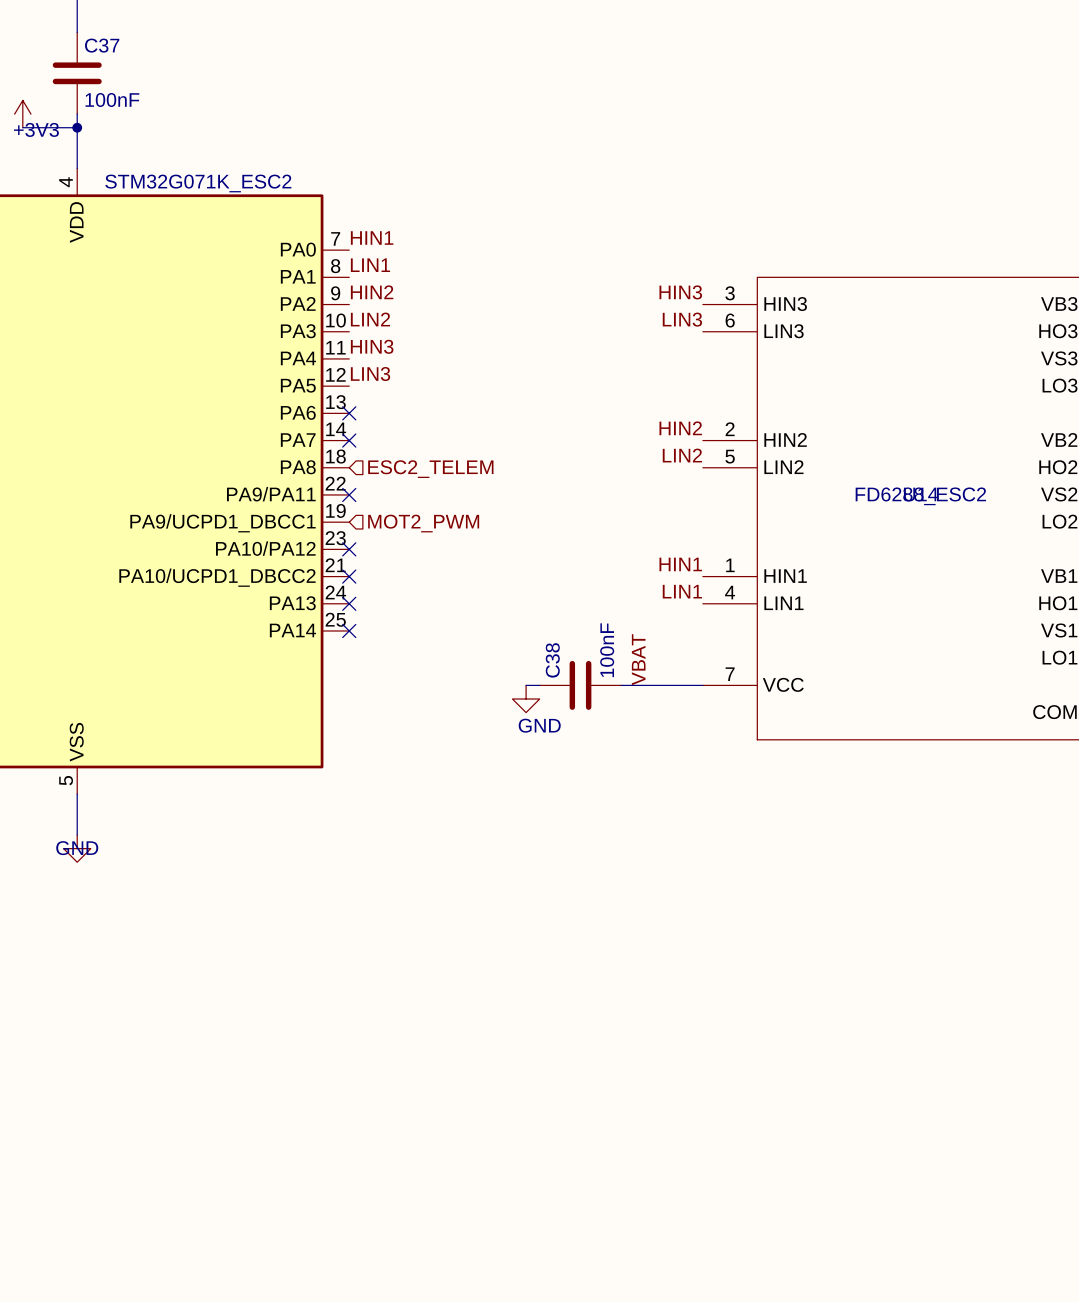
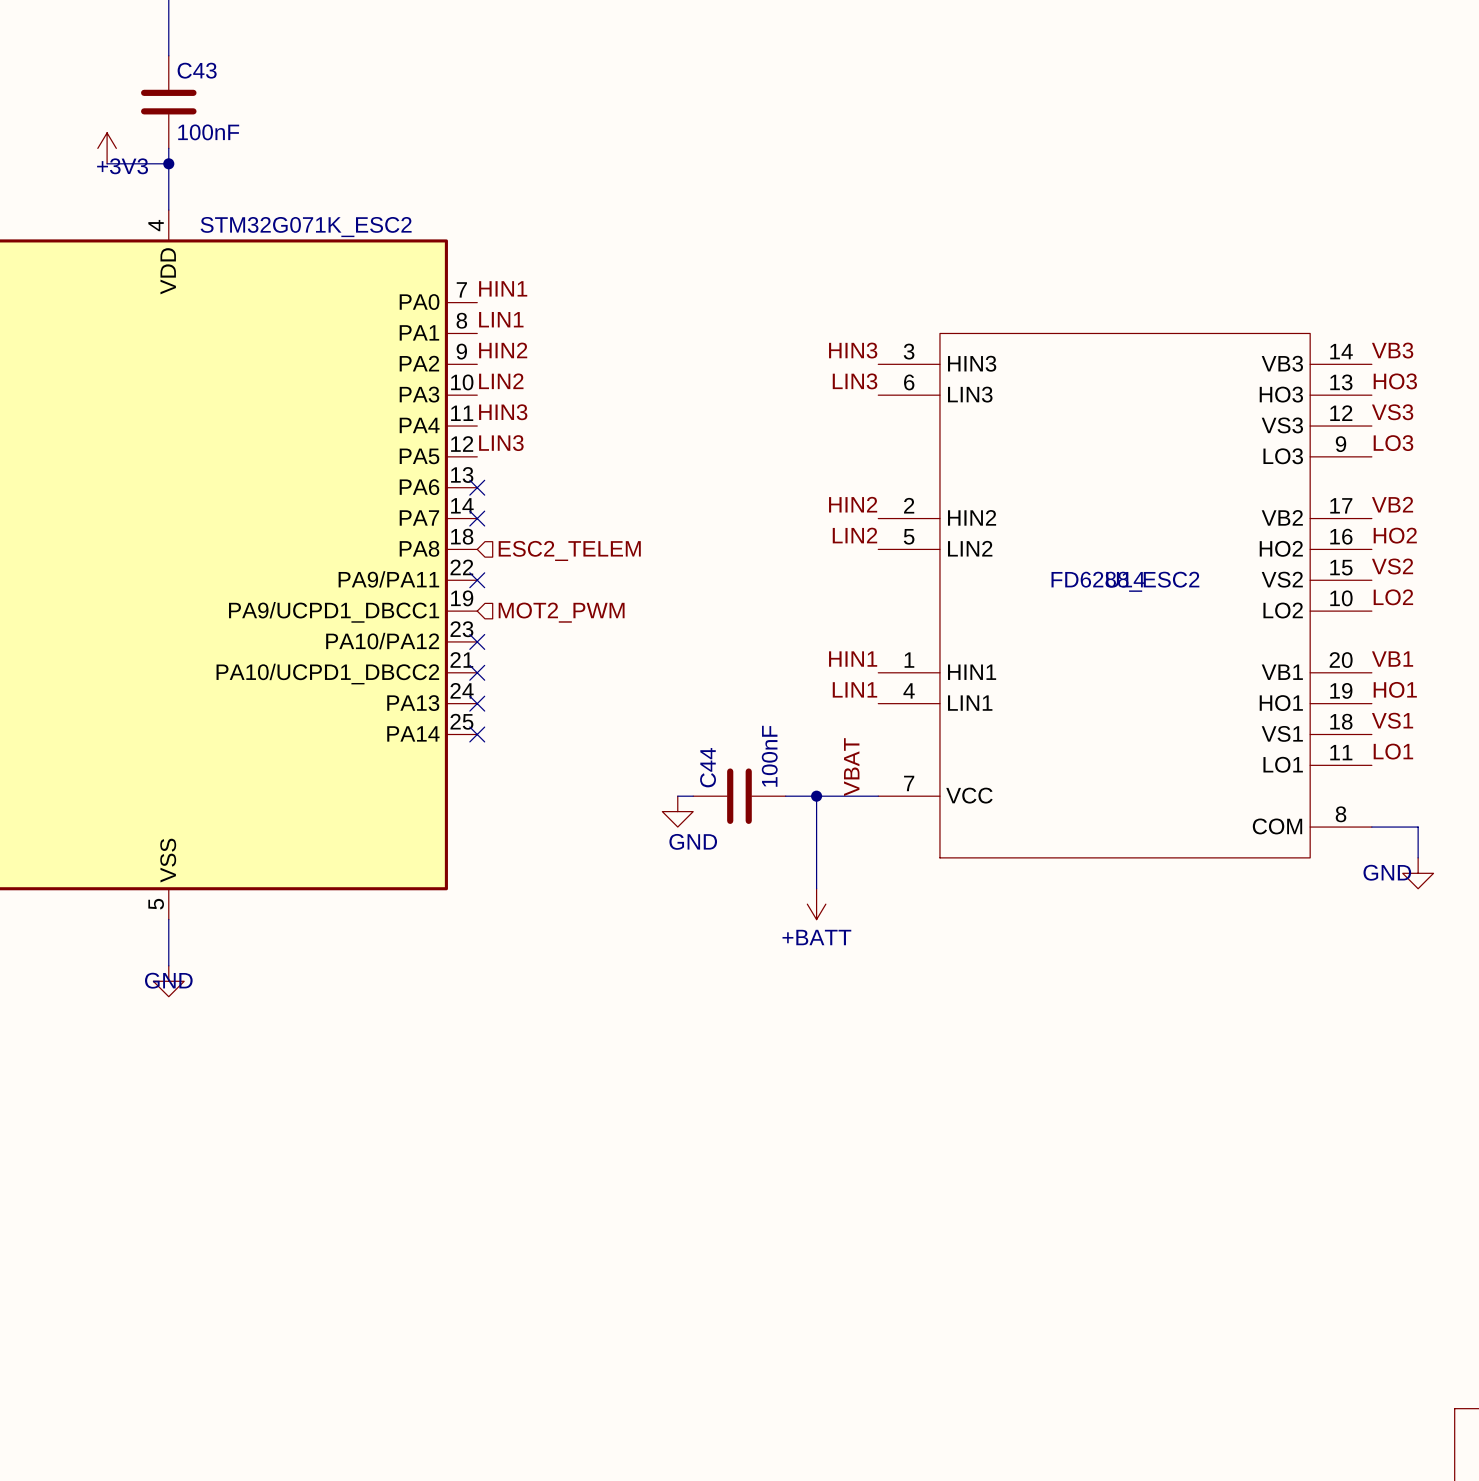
C37 name: C37 (102, 45) -> C43 (197, 70)
label position: VBAT (638, 659) -> VBAT (851, 767)
C38 name: C38 (552, 660) -> C44 (708, 767)
wire: none -> (816, 796) (816, 888)
junction: none -> (816, 796)
power symbol: none -> +BATT (816, 904)

